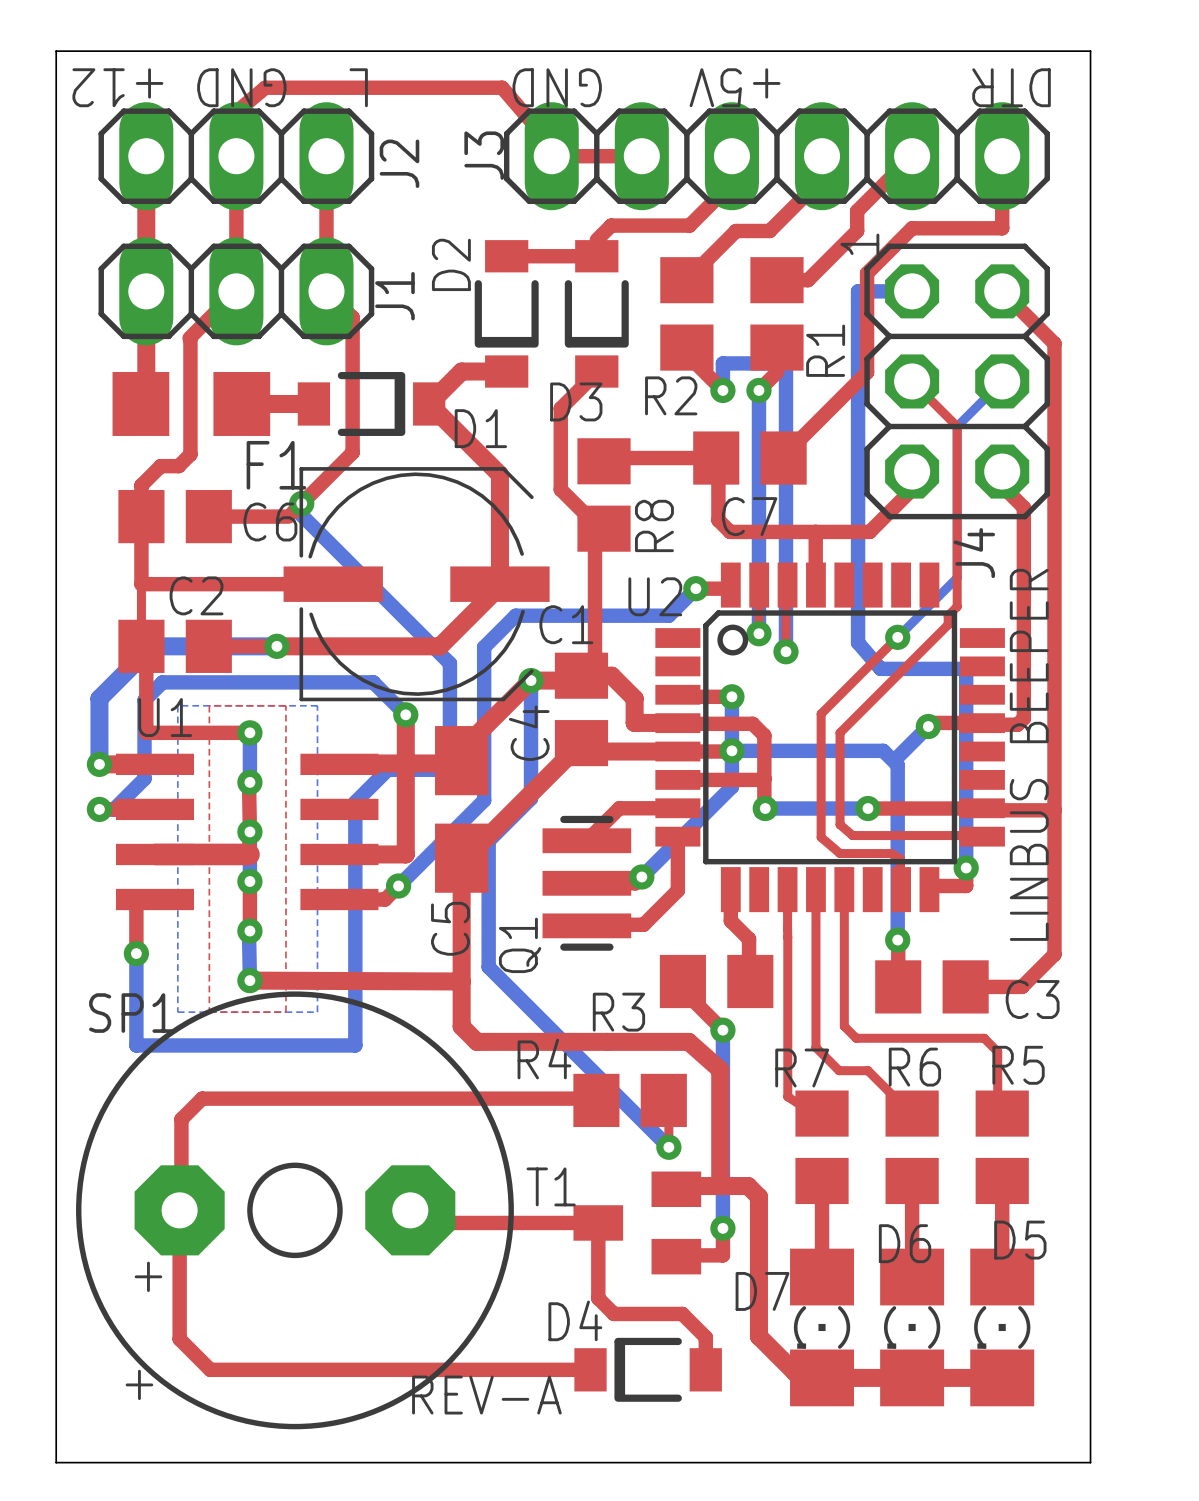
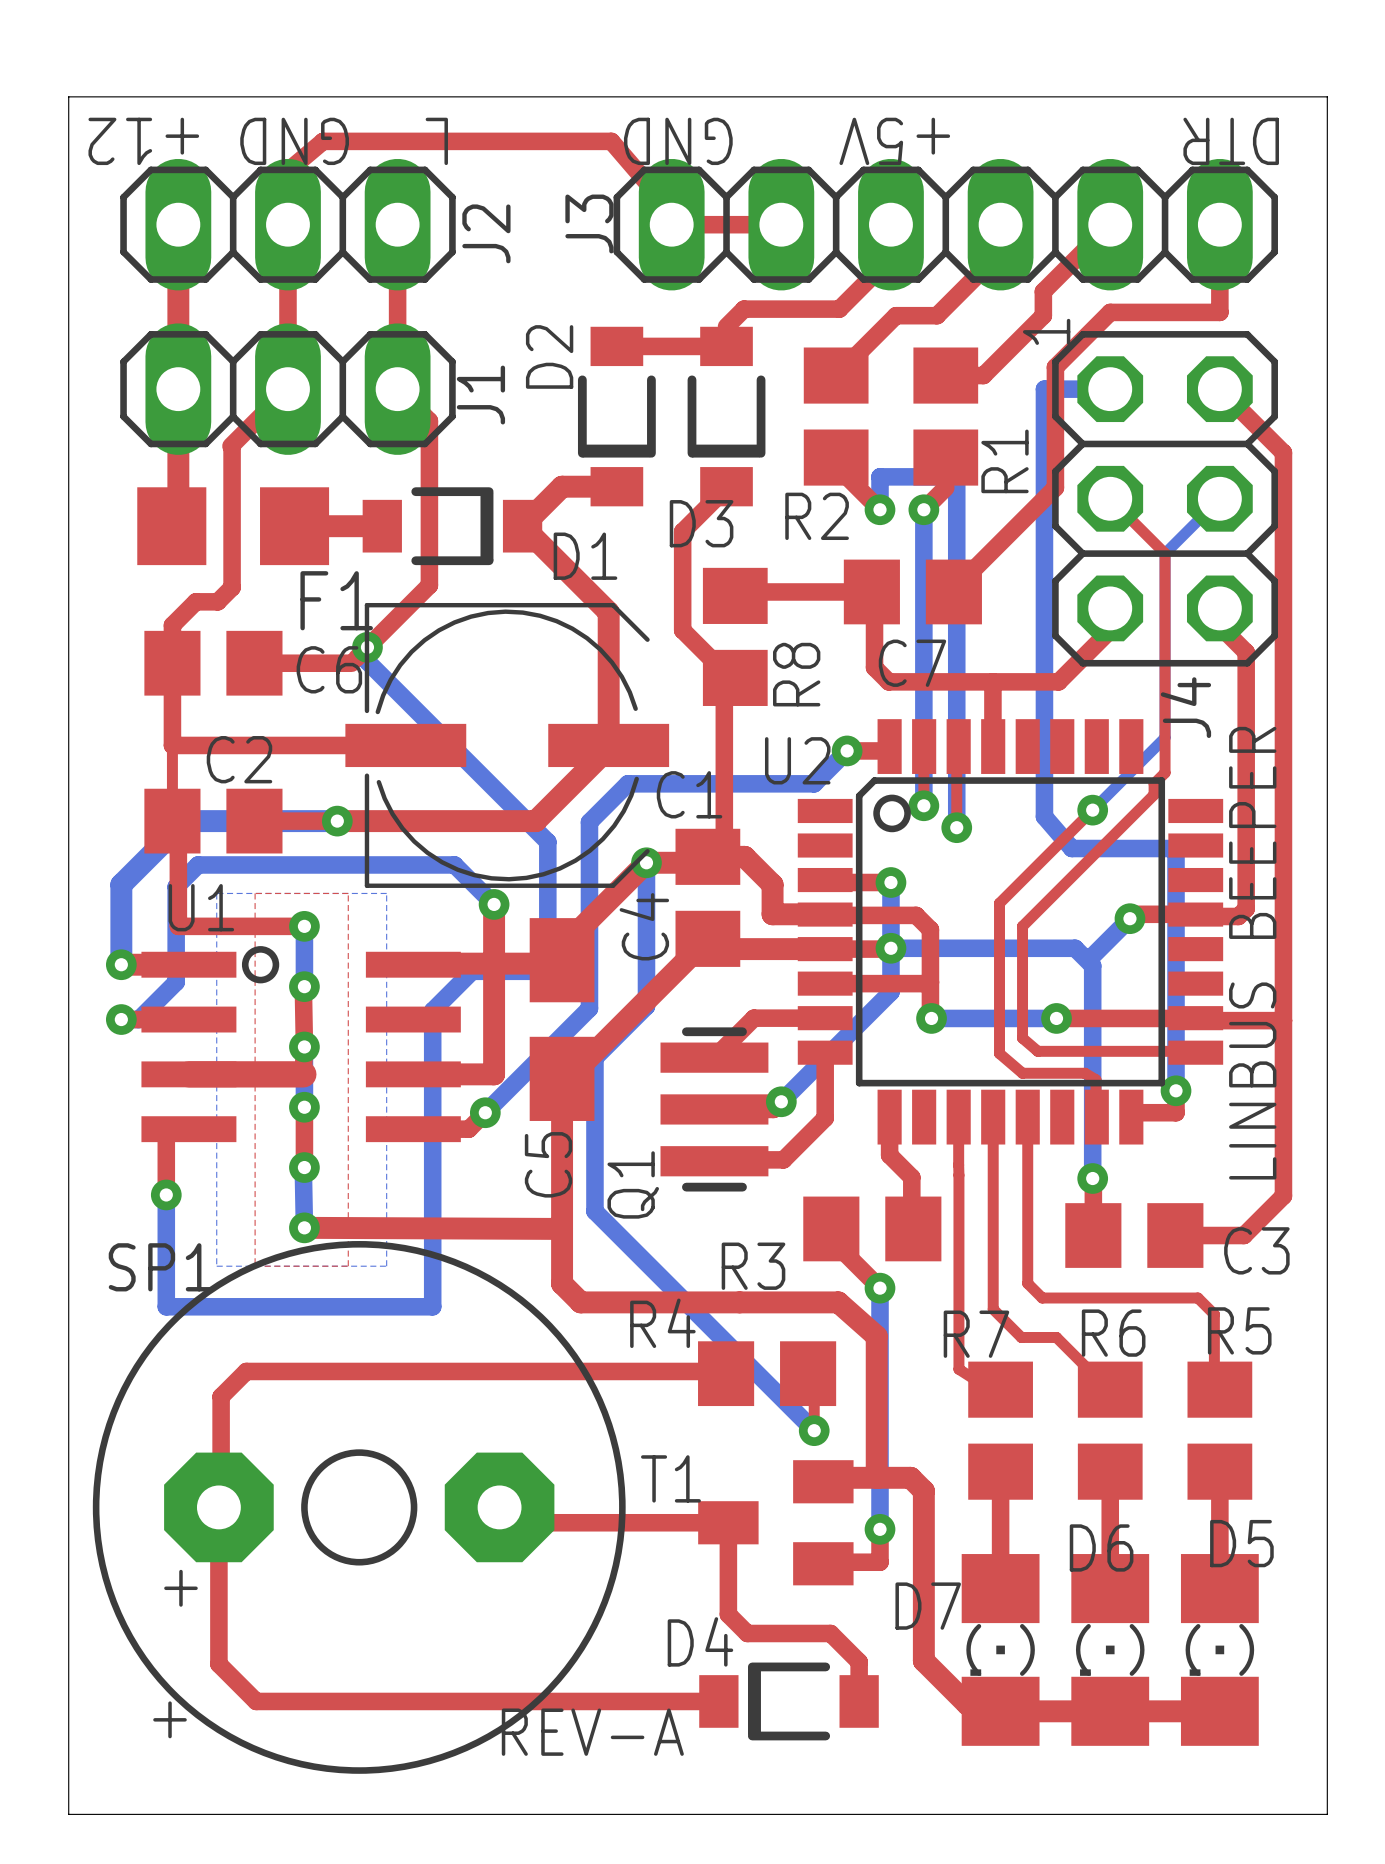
drawing: none -> [241, 946, 280, 984]

